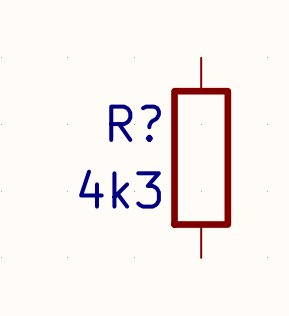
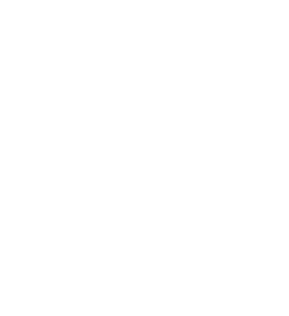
R?: 4k3 (201, 157) -> none

